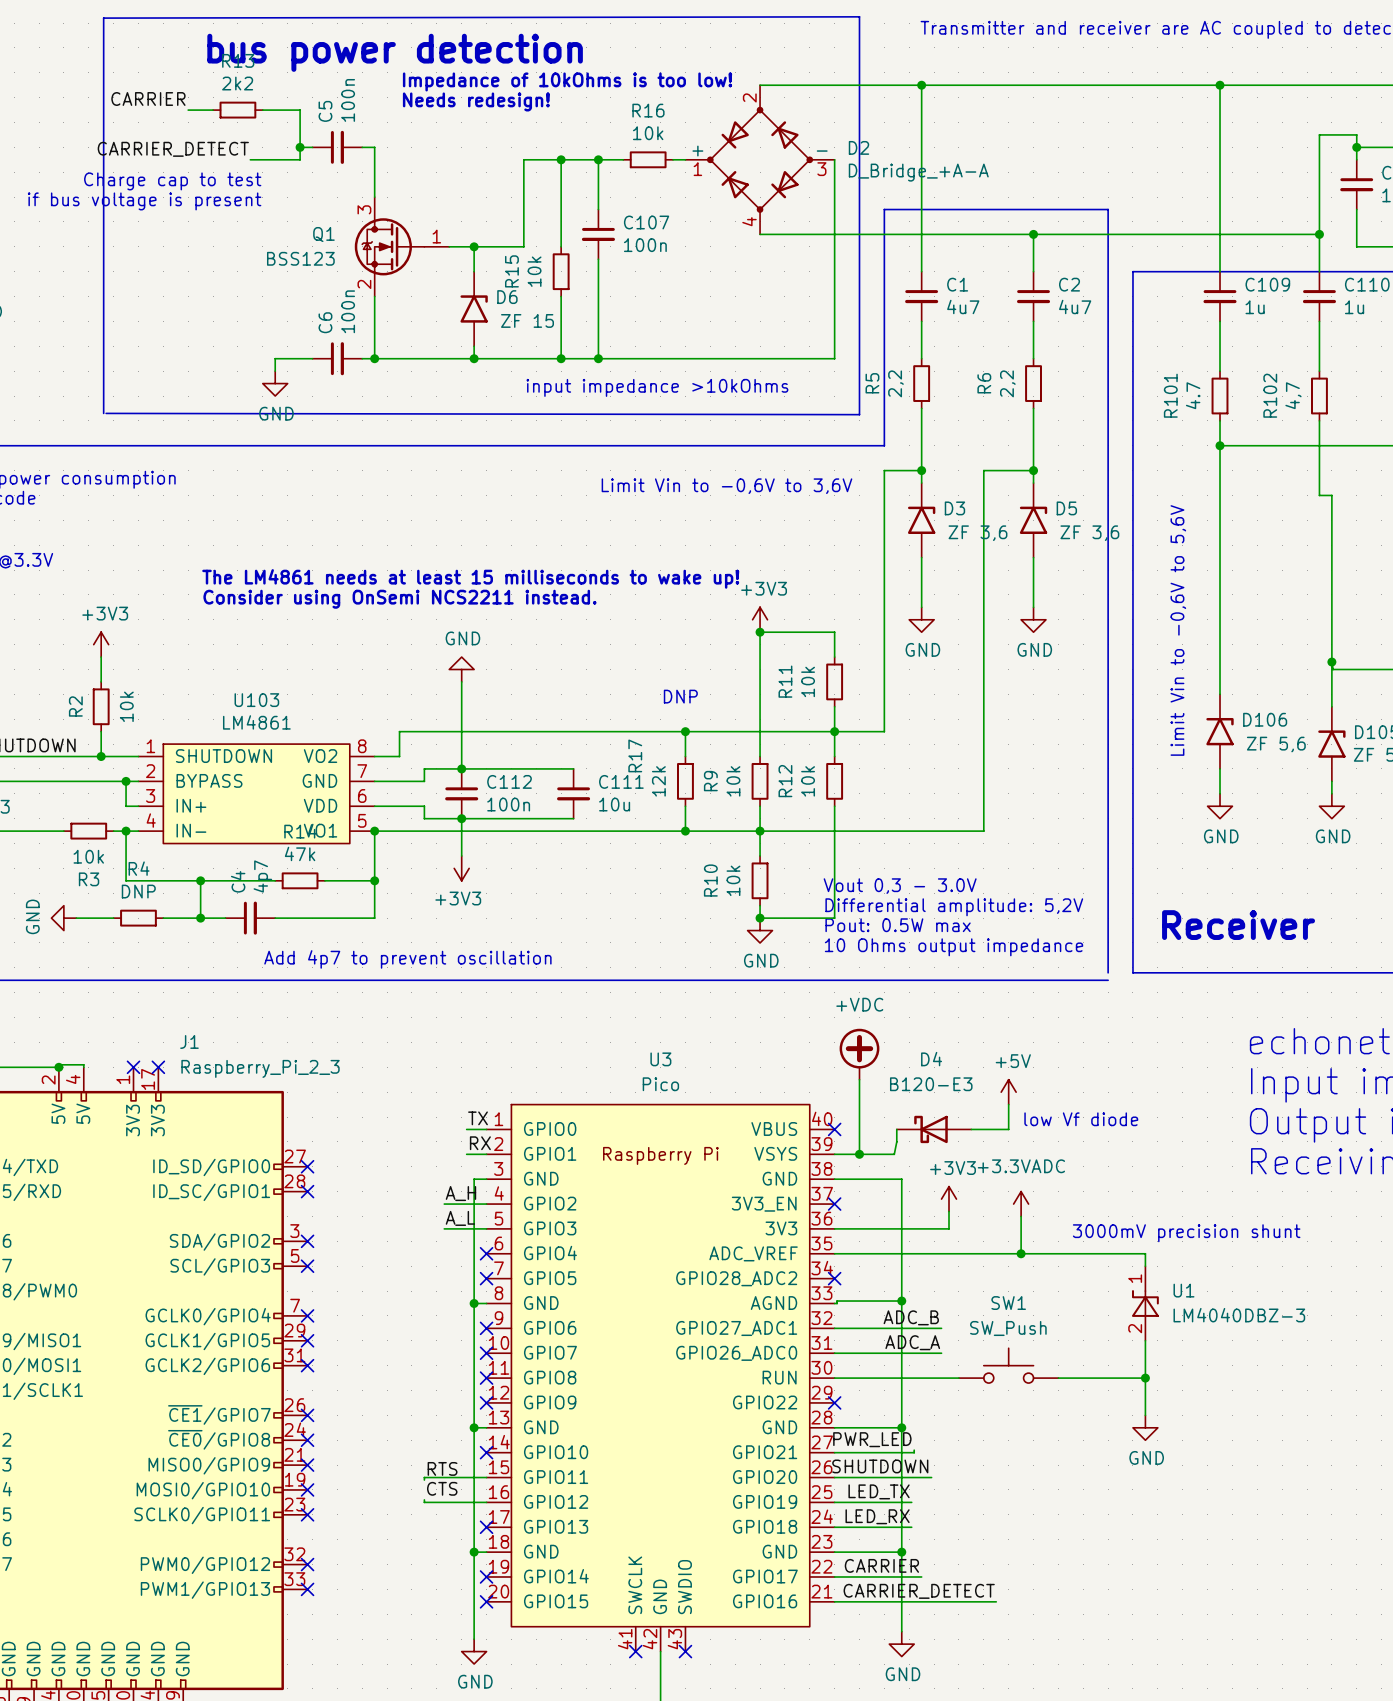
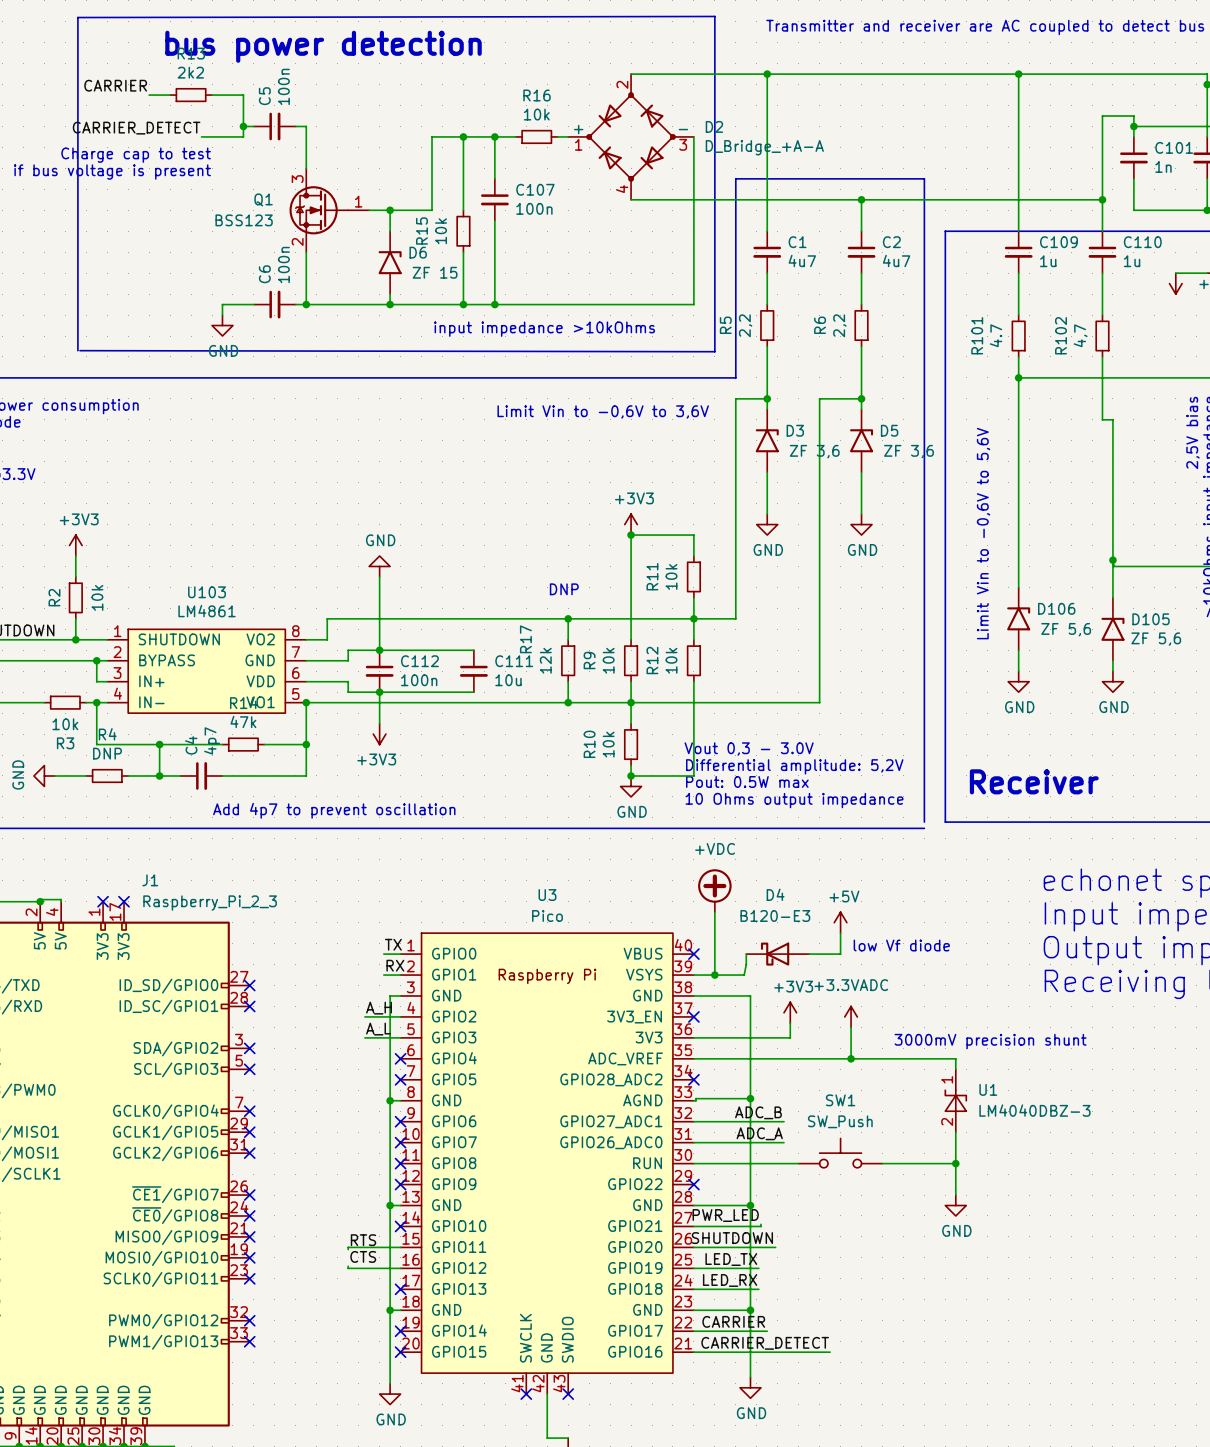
text: Impedance of 10kOhms is too low! (567, 81) -> none
text: Needs redesign! (476, 101) -> none
text: The LM4861 needs at least 15 milliseconds to wake up! (470, 578) -> none
text: Consider using OnSemi NCS2211 instead. (399, 599) -> none

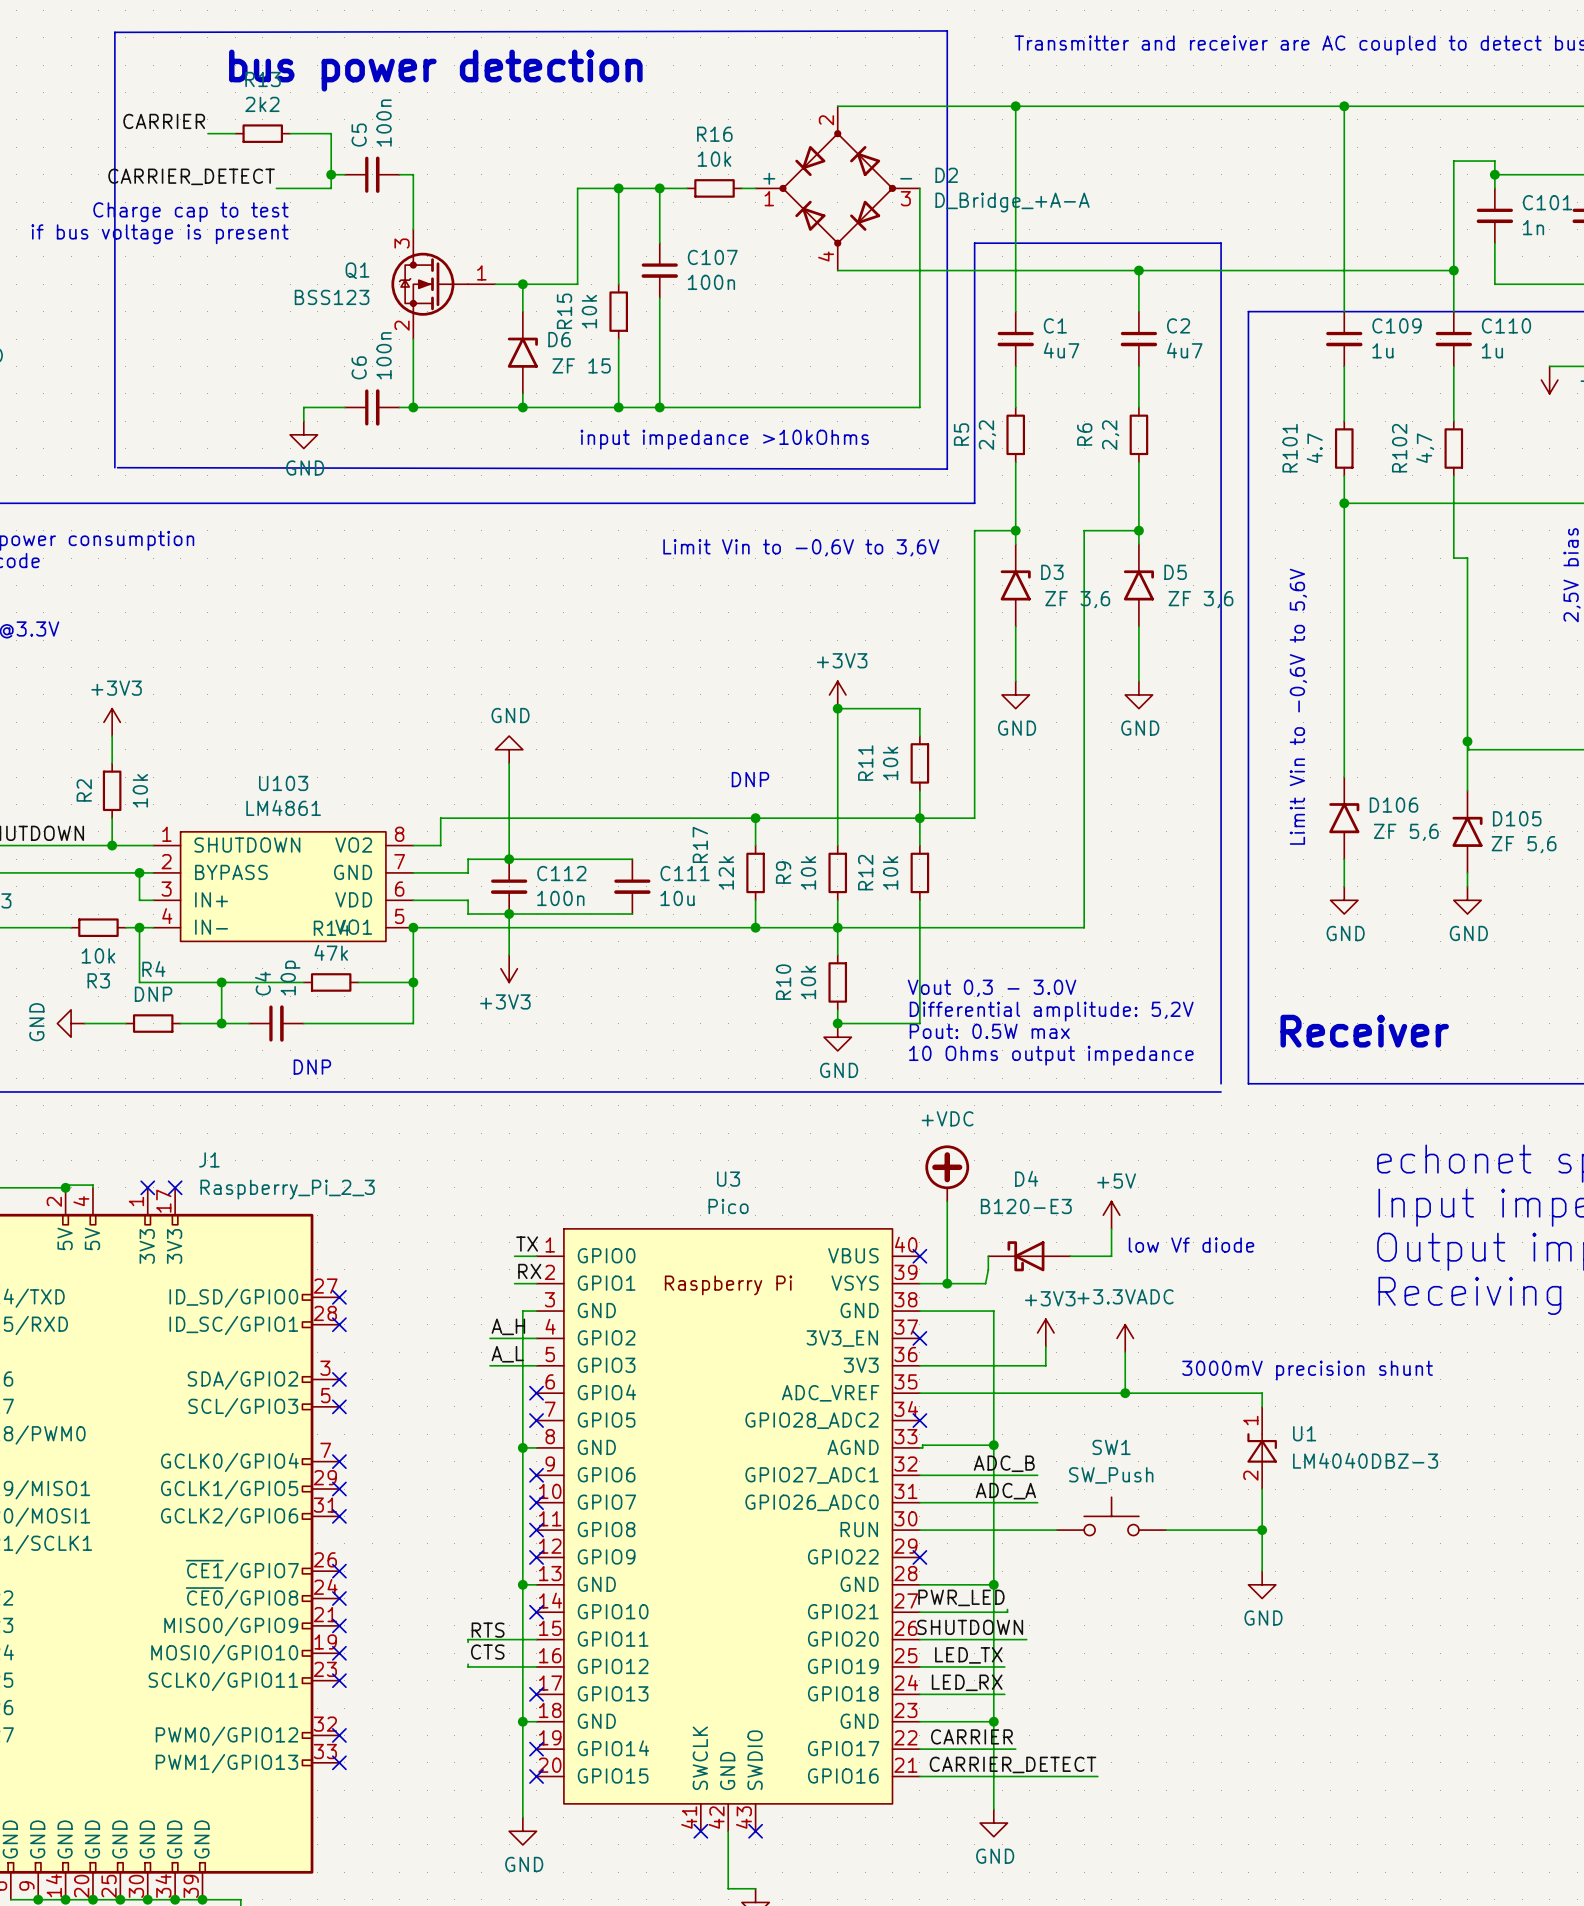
C4 value: 4p7 (212, 740) -> 10p (290, 978)
text: Add 4p7 to prevent oscillation (334, 810) -> DNP (312, 1067)

